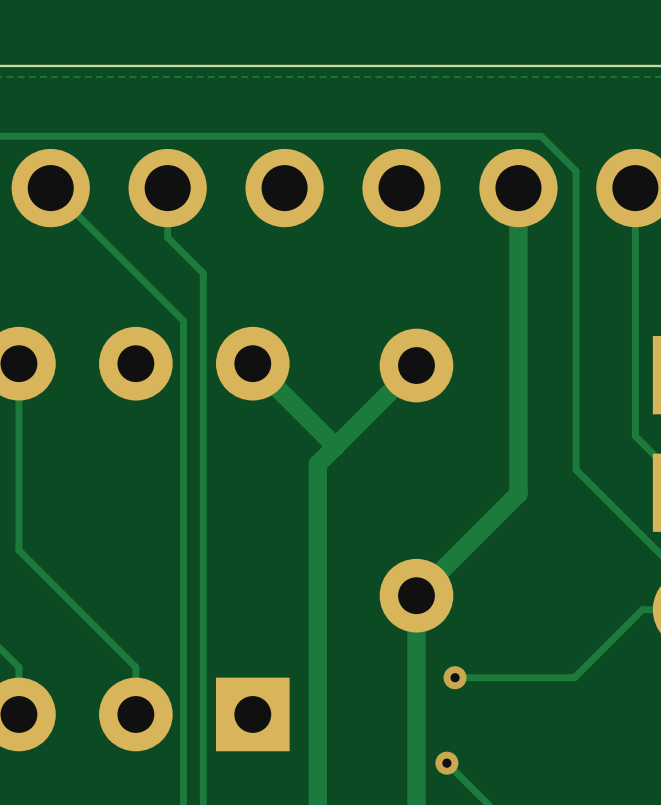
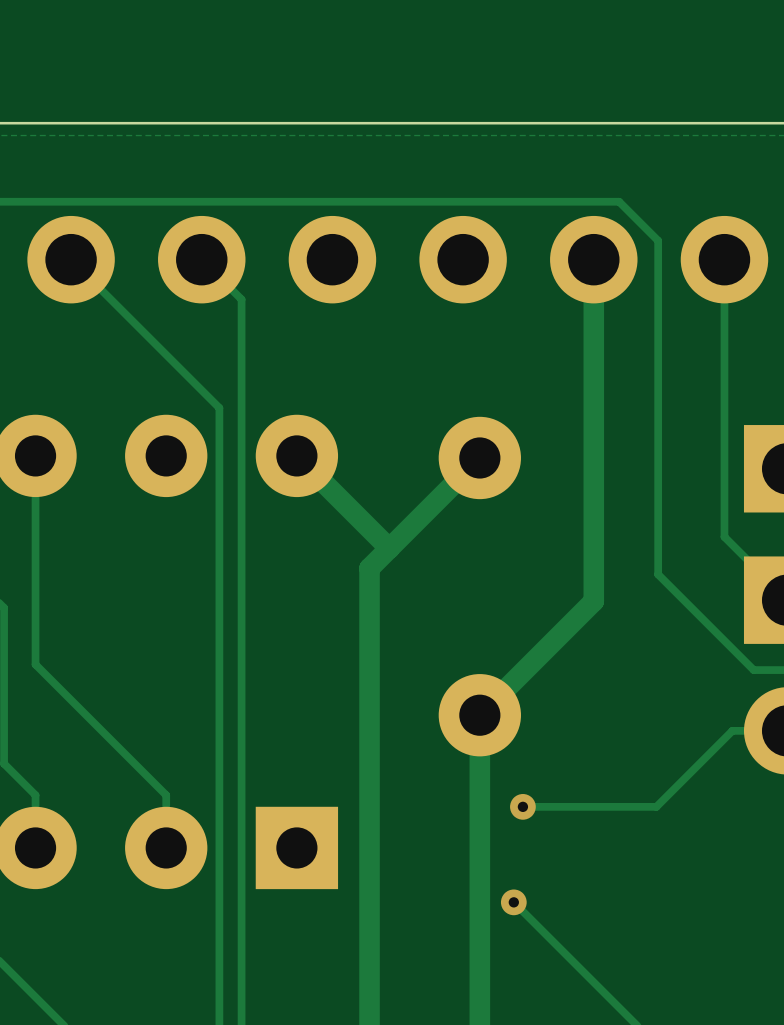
track: (167, 188) (167, 237) (203, 273) -> (201, 259) (241, 299) (241, 354)

